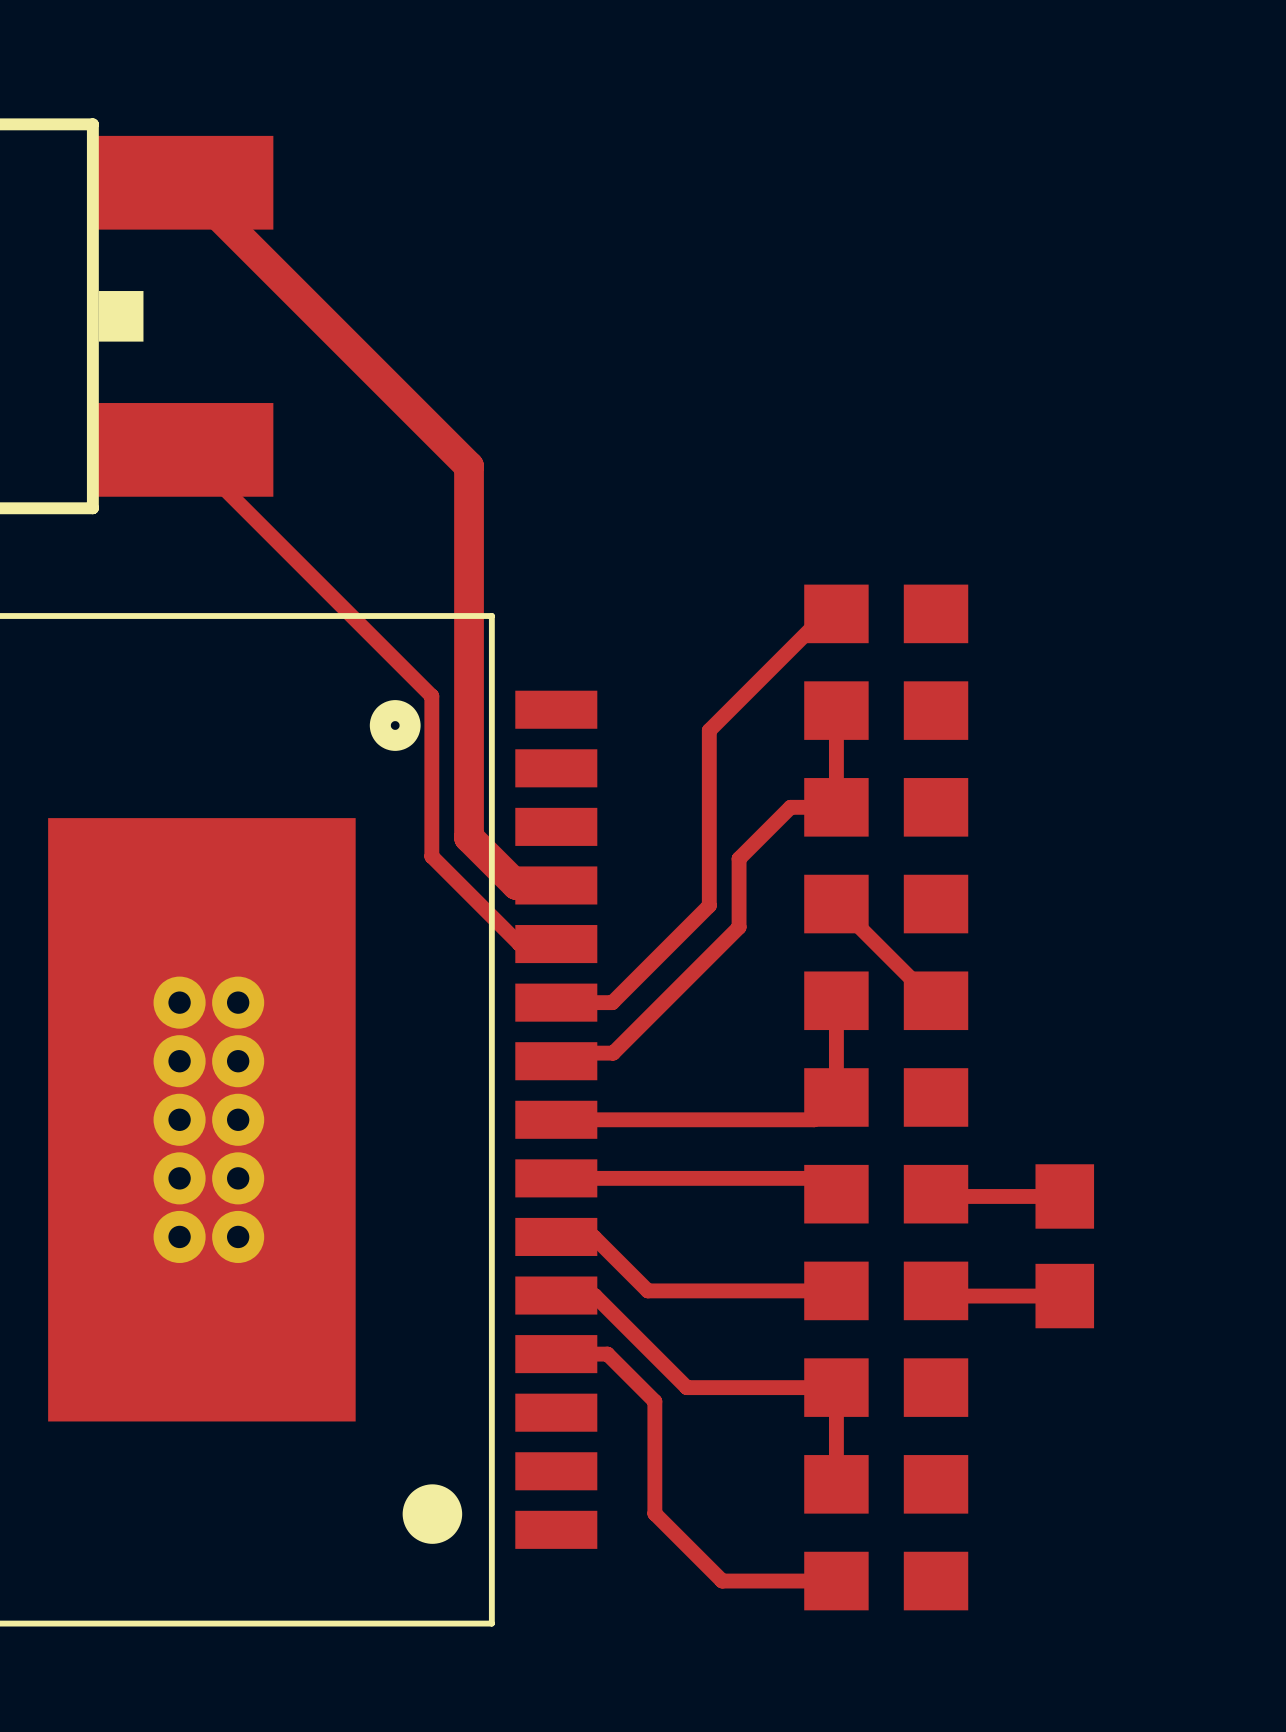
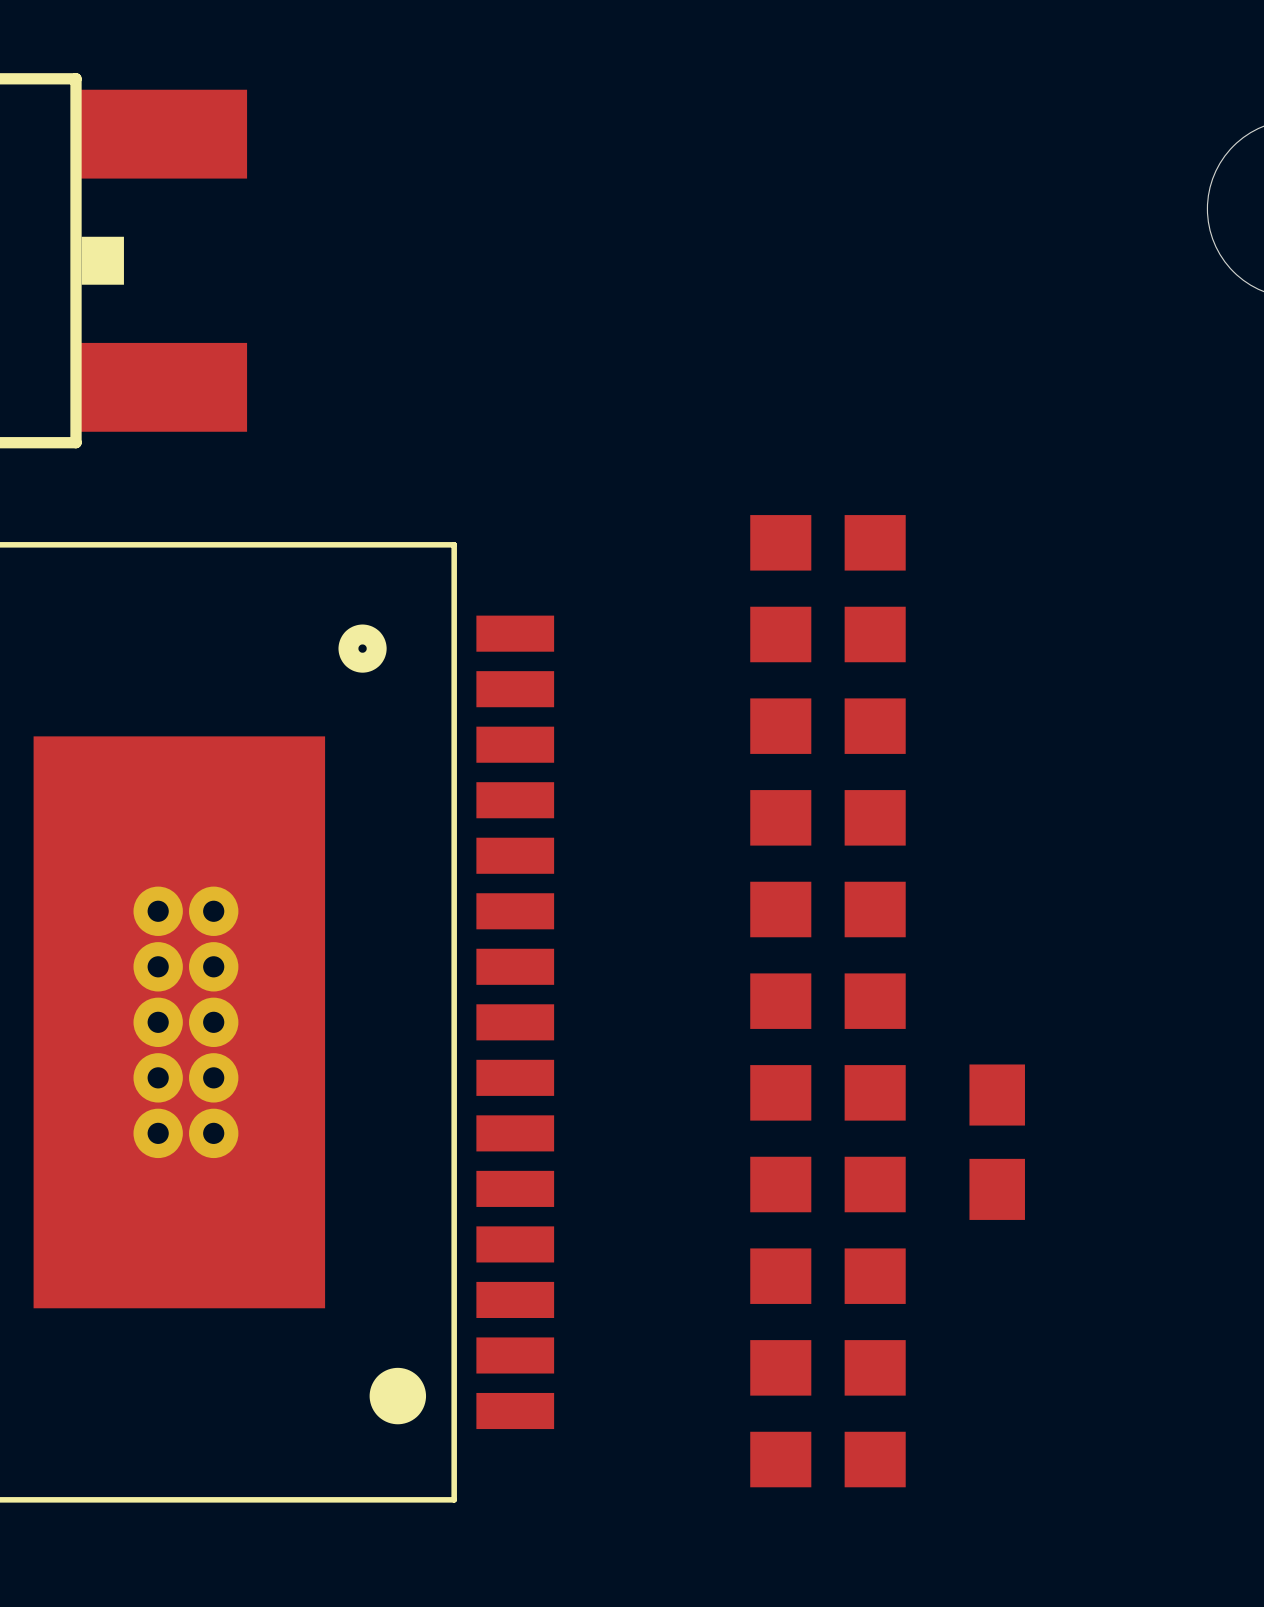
track: (185, 182) (469, 466) (469, 837) (516, 885) (555, 885) -> none
track: (185, 449) (431, 696) (431, 856) (519, 944) (556, 944) -> none
track: (836, 613) (825, 613) (709, 730) (709, 905) (612, 1002) (556, 1002) -> none
track: (836, 710) (836, 807) (790, 807) (739, 858) (739, 927) (613, 1053) (564, 1053) (556, 1061) -> none
track: (836, 904) (933, 1000) (936, 1000) -> none
track: (836, 1000) (836, 1097) (814, 1119) (556, 1119) -> none
track: (556, 1178) (820, 1178) (836, 1194) -> none
track: (936, 1194) (938, 1196) (1064, 1196) -> none
track: (556, 1236) (593, 1236) (647, 1290) (836, 1290) -> none
track: (936, 1290) (941, 1296) (1064, 1296) -> none
track: (556, 1295) (594, 1295) (686, 1387) (836, 1387) (836, 1484) -> none
track: (556, 1354) (607, 1354) (654, 1401) (654, 1513) (722, 1581) (836, 1581) -> none

